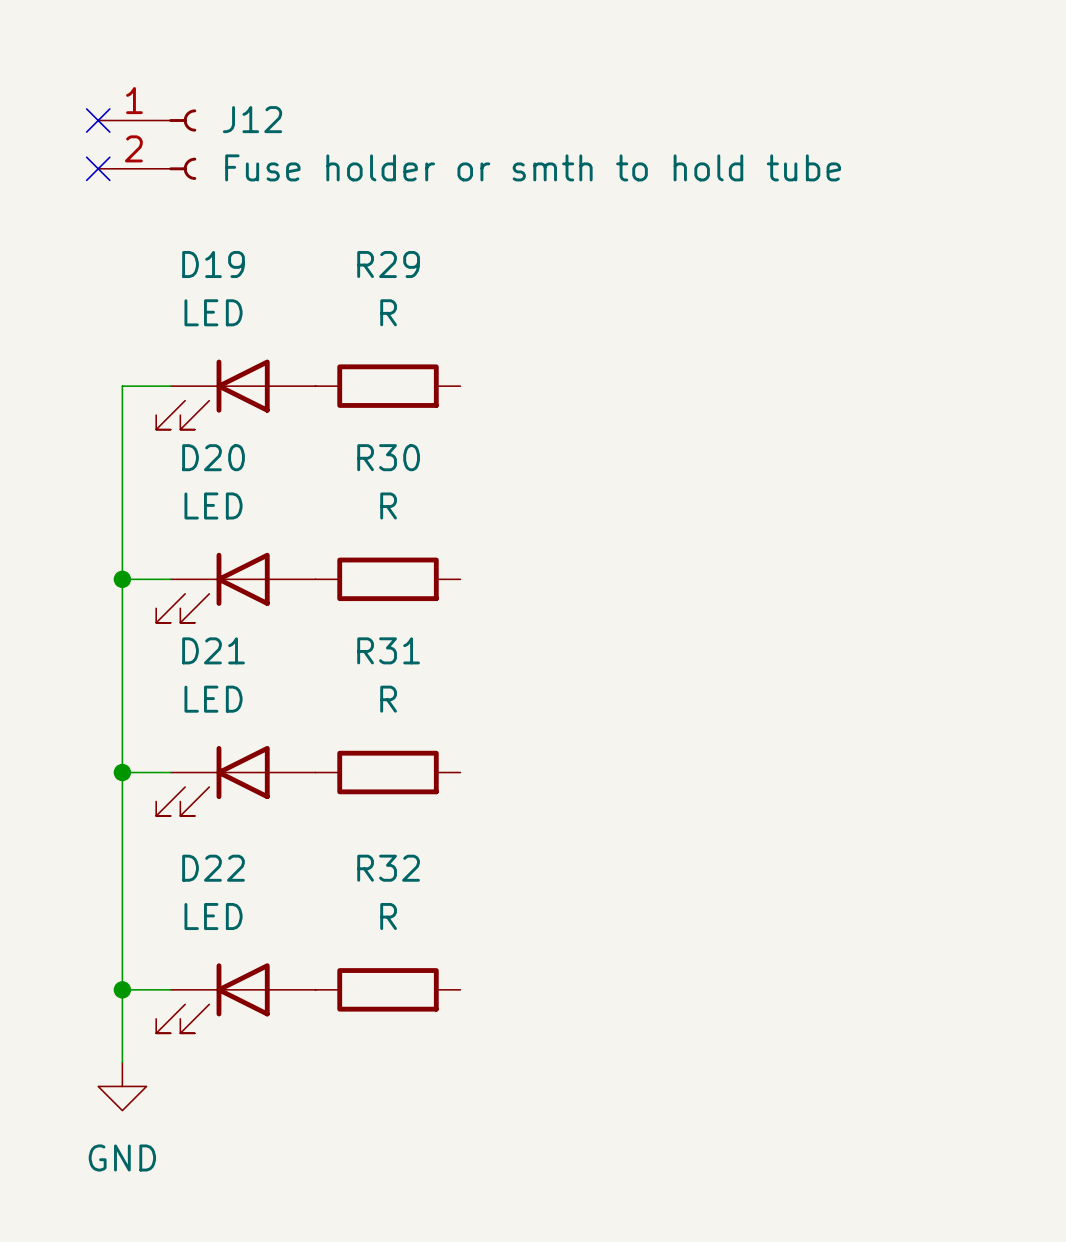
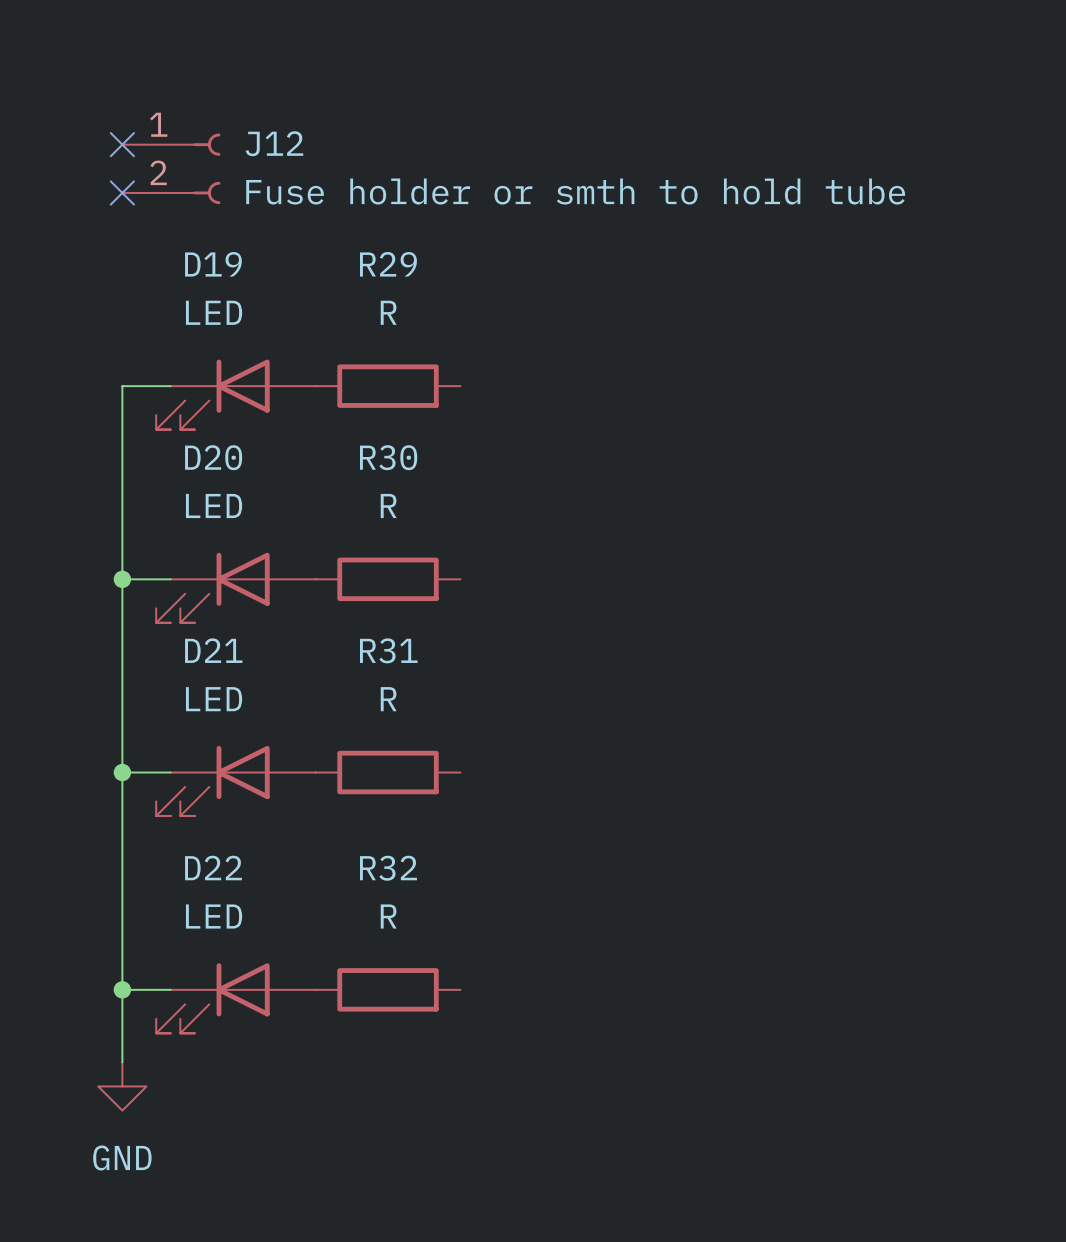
no-connect mark: (98, 120) -> none
no-connect mark: none -> (122, 144)
J12 position: (147, 144) -> (171, 168)
no-connect mark: (98, 168) -> none
no-connect mark: none -> (122, 192)

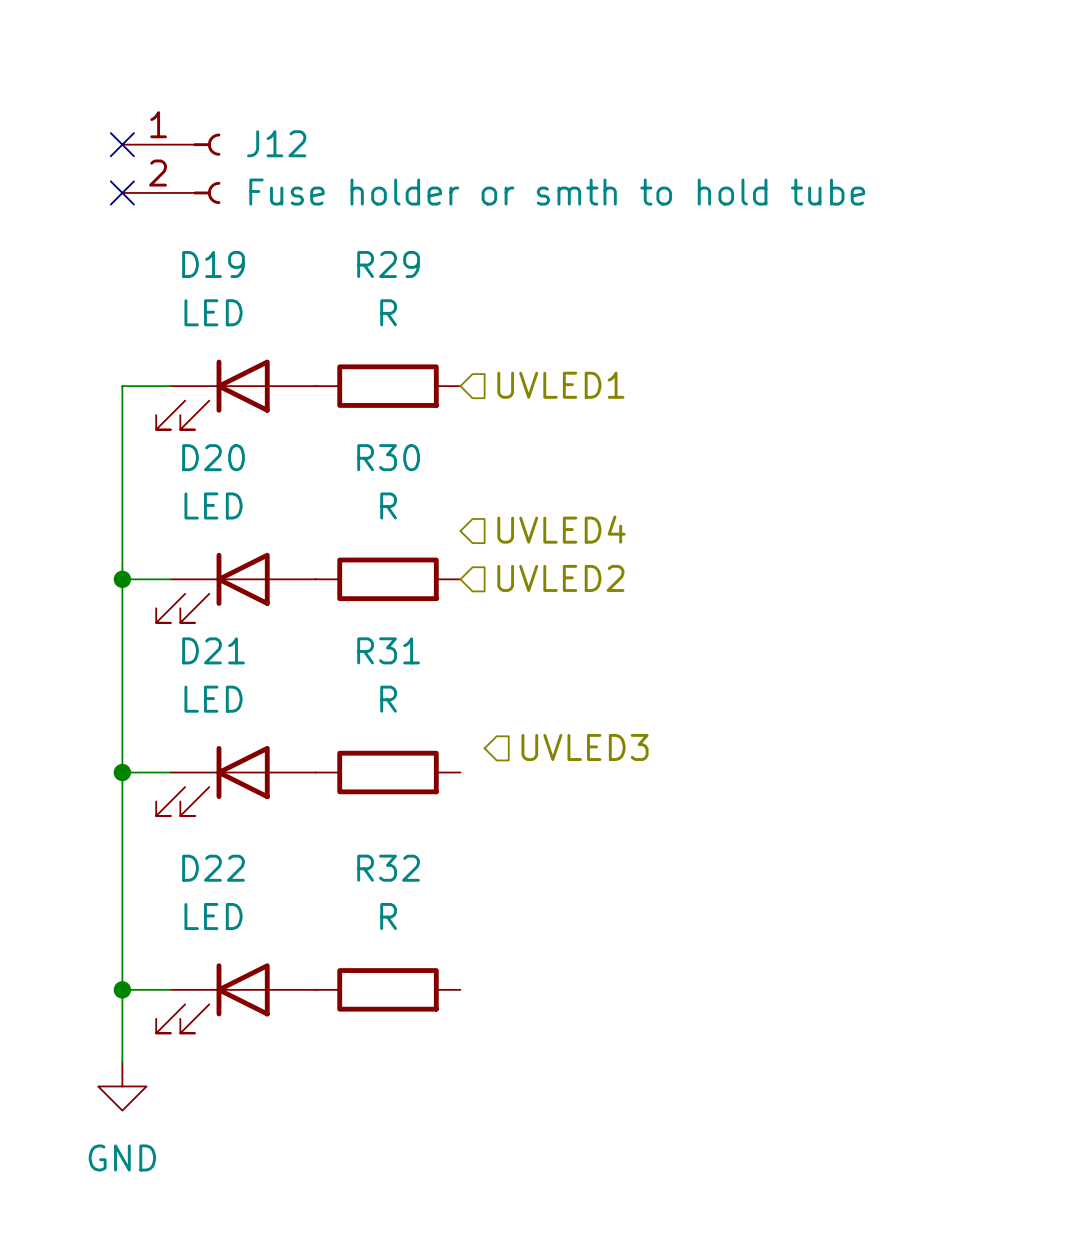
hierarchical label: none -> UVLED1 (560, 385)
hierarchical label: none -> UVLED4 (561, 529)
hierarchical label: none -> UVLED2 (560, 578)
hierarchical label: none -> UVLED3 (585, 747)

